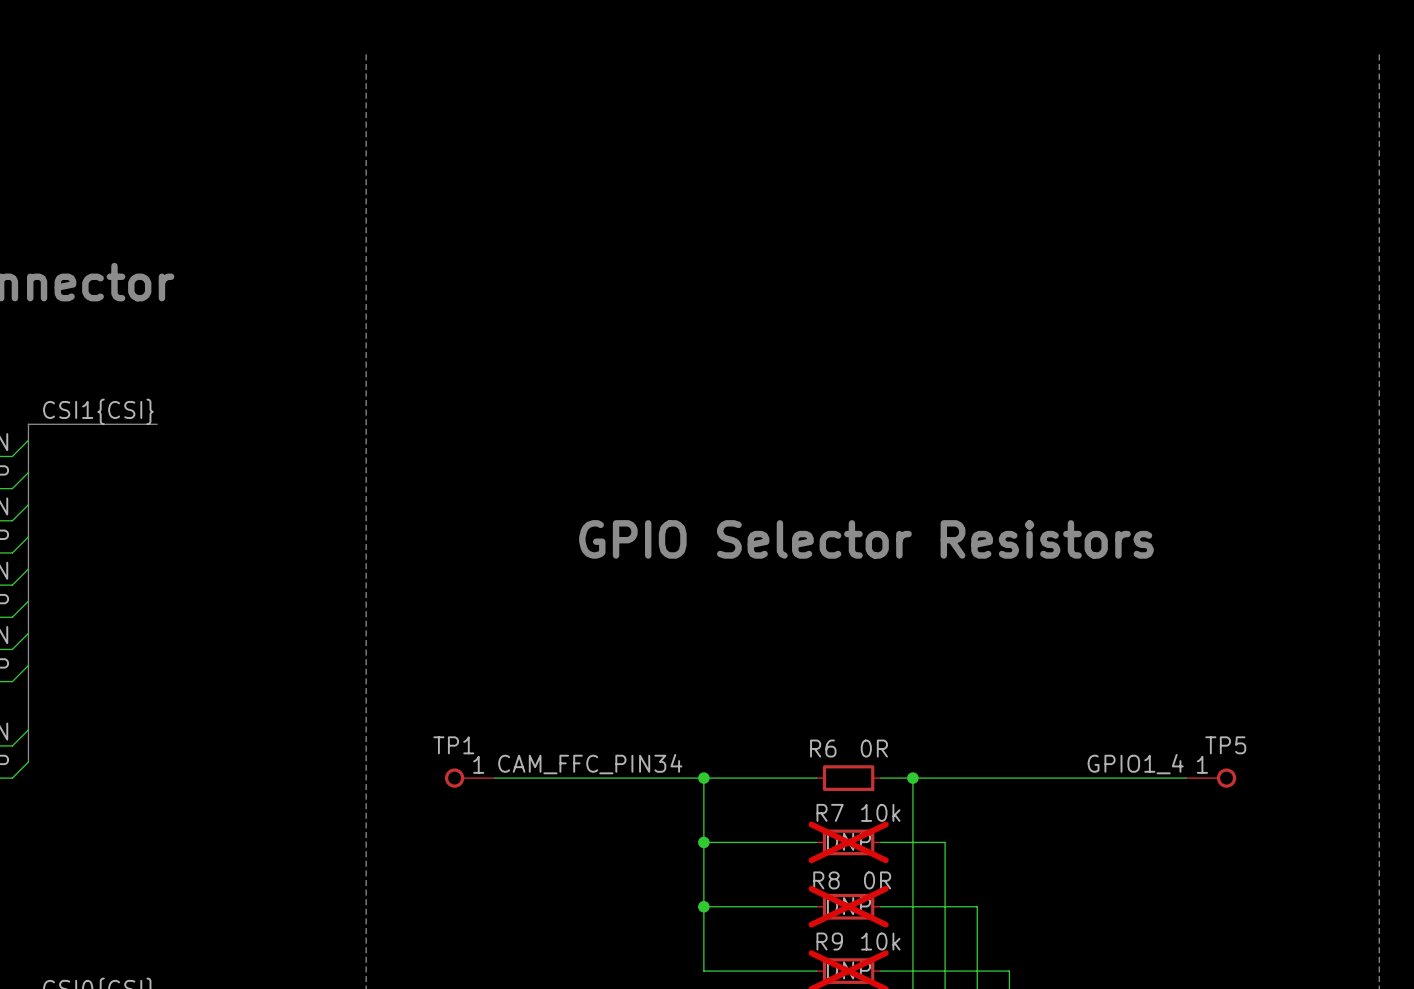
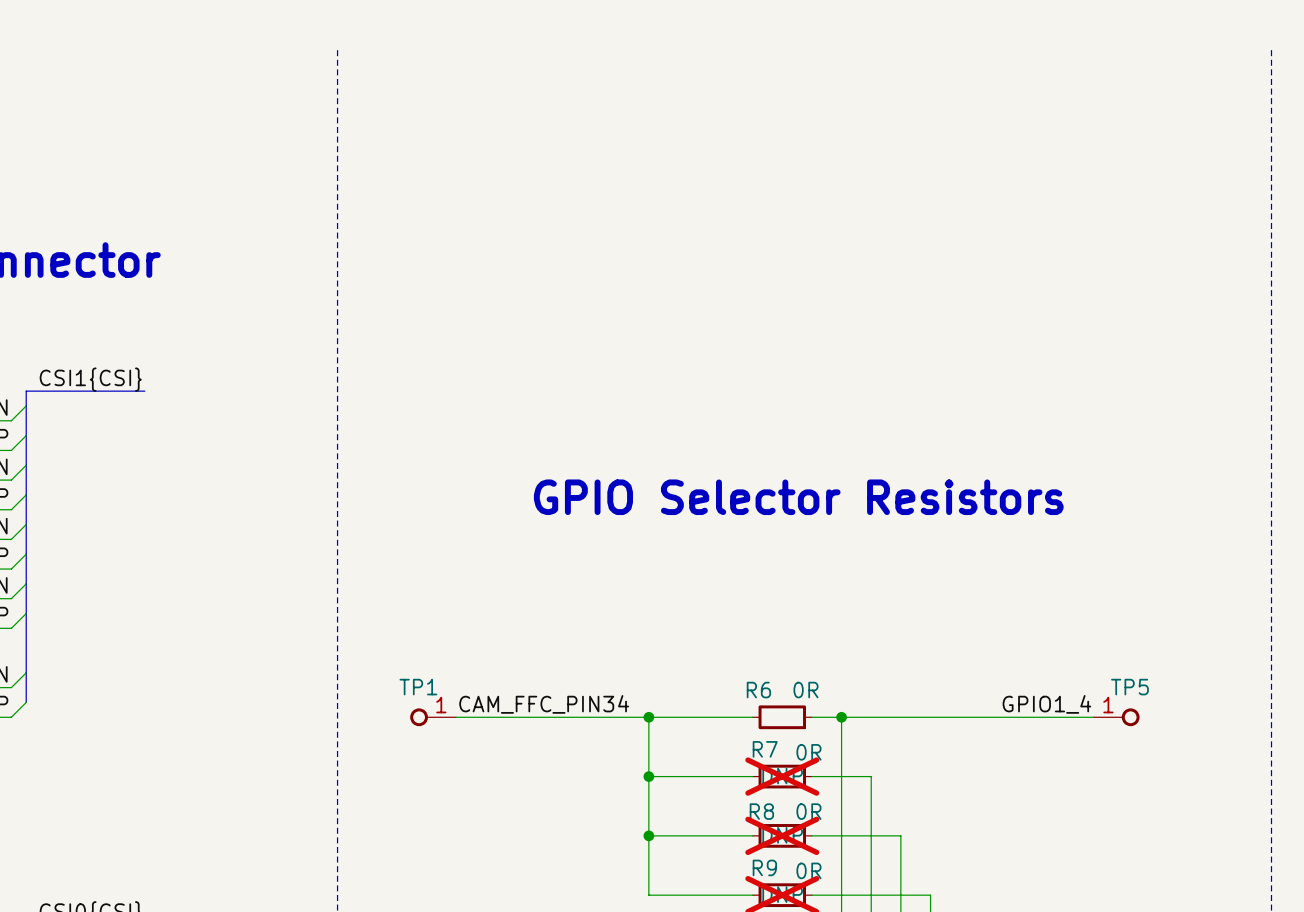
R7 text: 10k (880, 812) -> 0R (808, 752)
R9 text: 10k (880, 941) -> 0R (808, 870)

